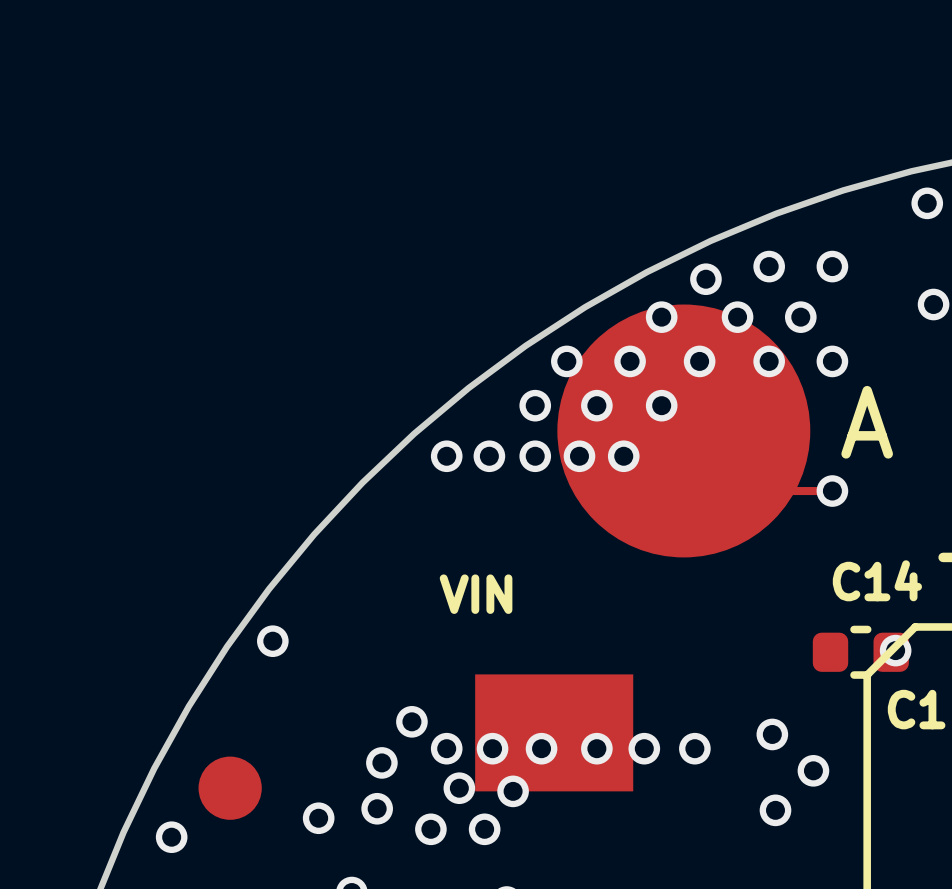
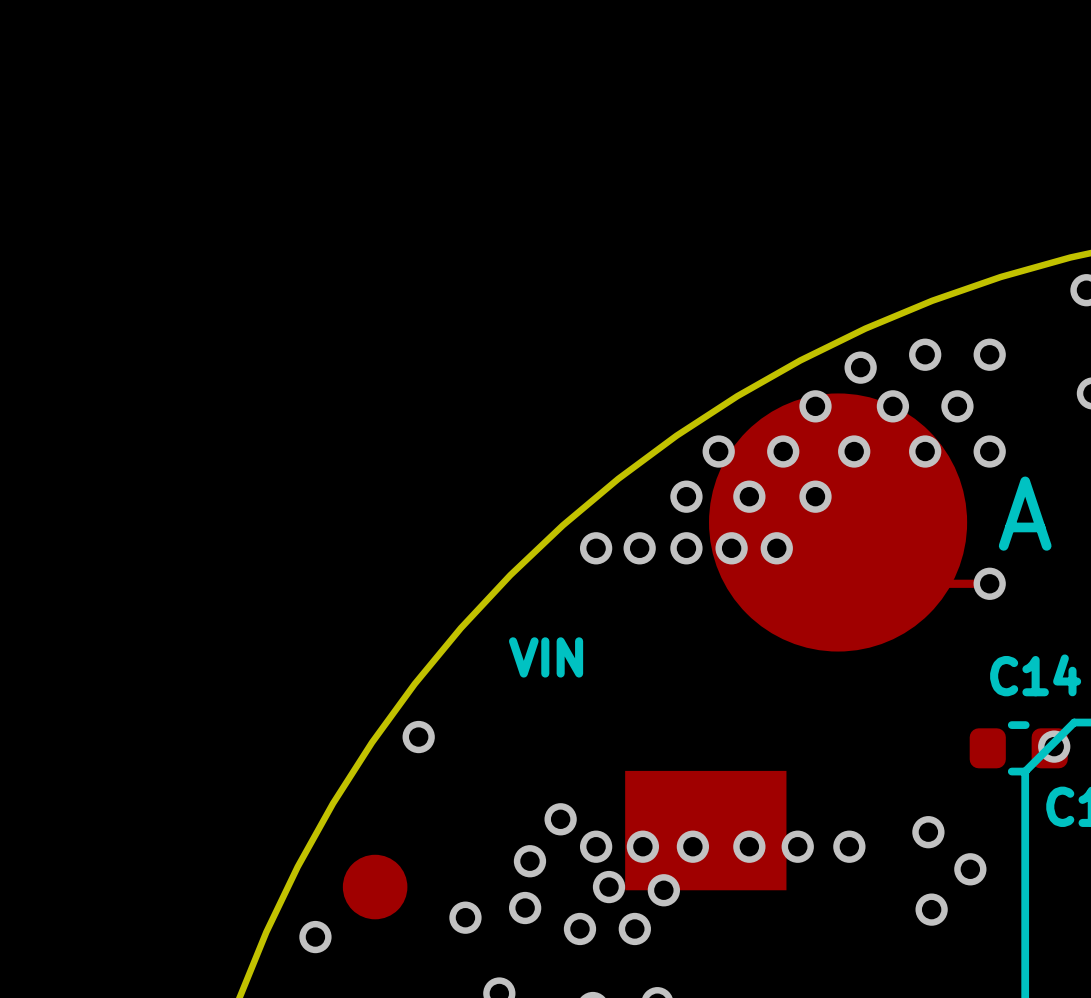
text position: VIN (476, 594) -> VIN (546, 657)

